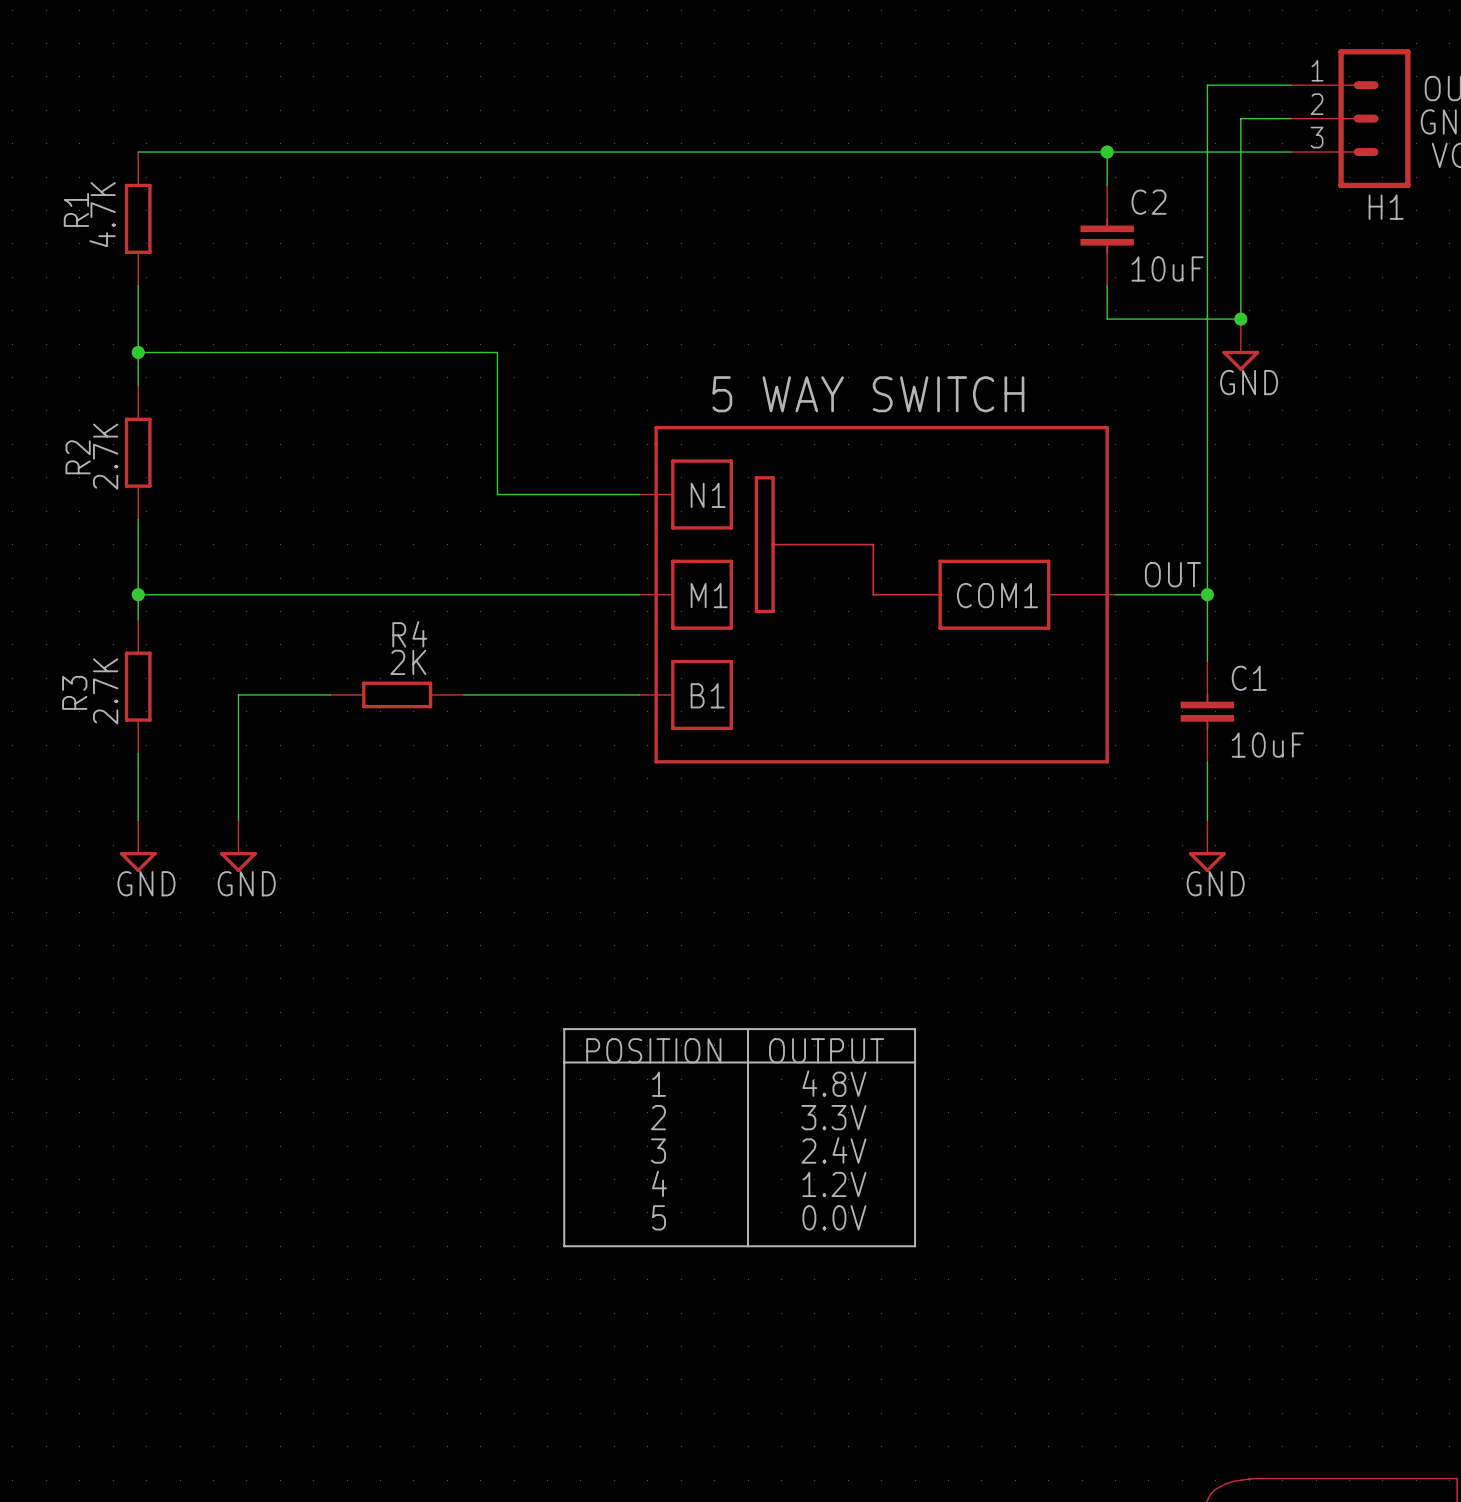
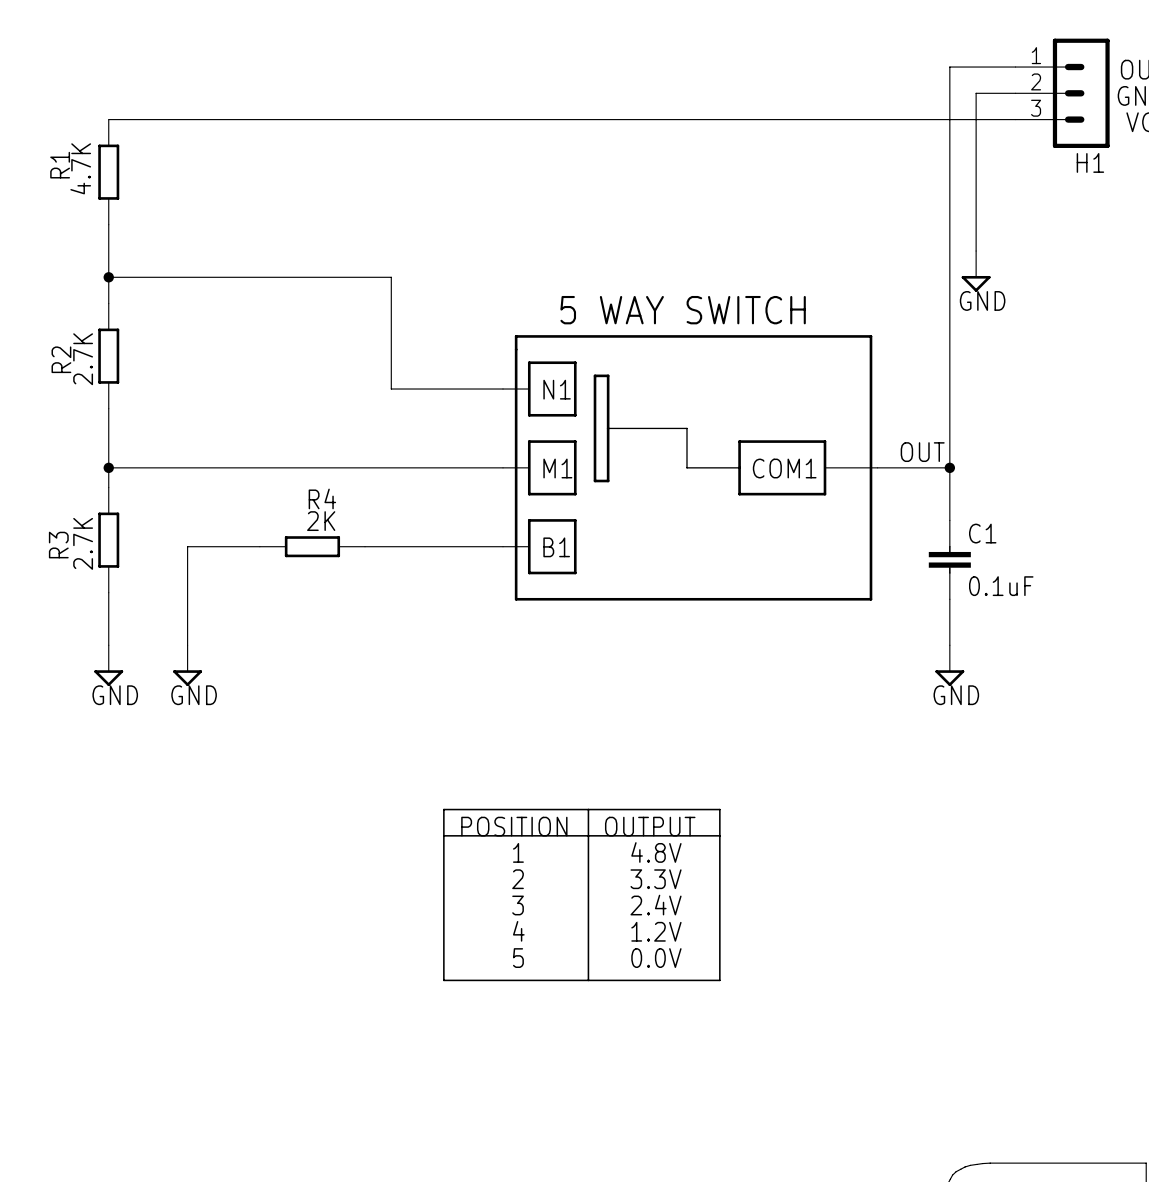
wire: (1107, 152) (1107, 185) -> none
junction: (1107, 152) -> none
C2: 10uF (1107, 235) -> none
wire: (1107, 285) (1107, 319) (1240, 319) -> none
junction: (1240, 319) -> none
C1 value: 10uF (1267, 745) -> 0.1uF (1001, 586)

